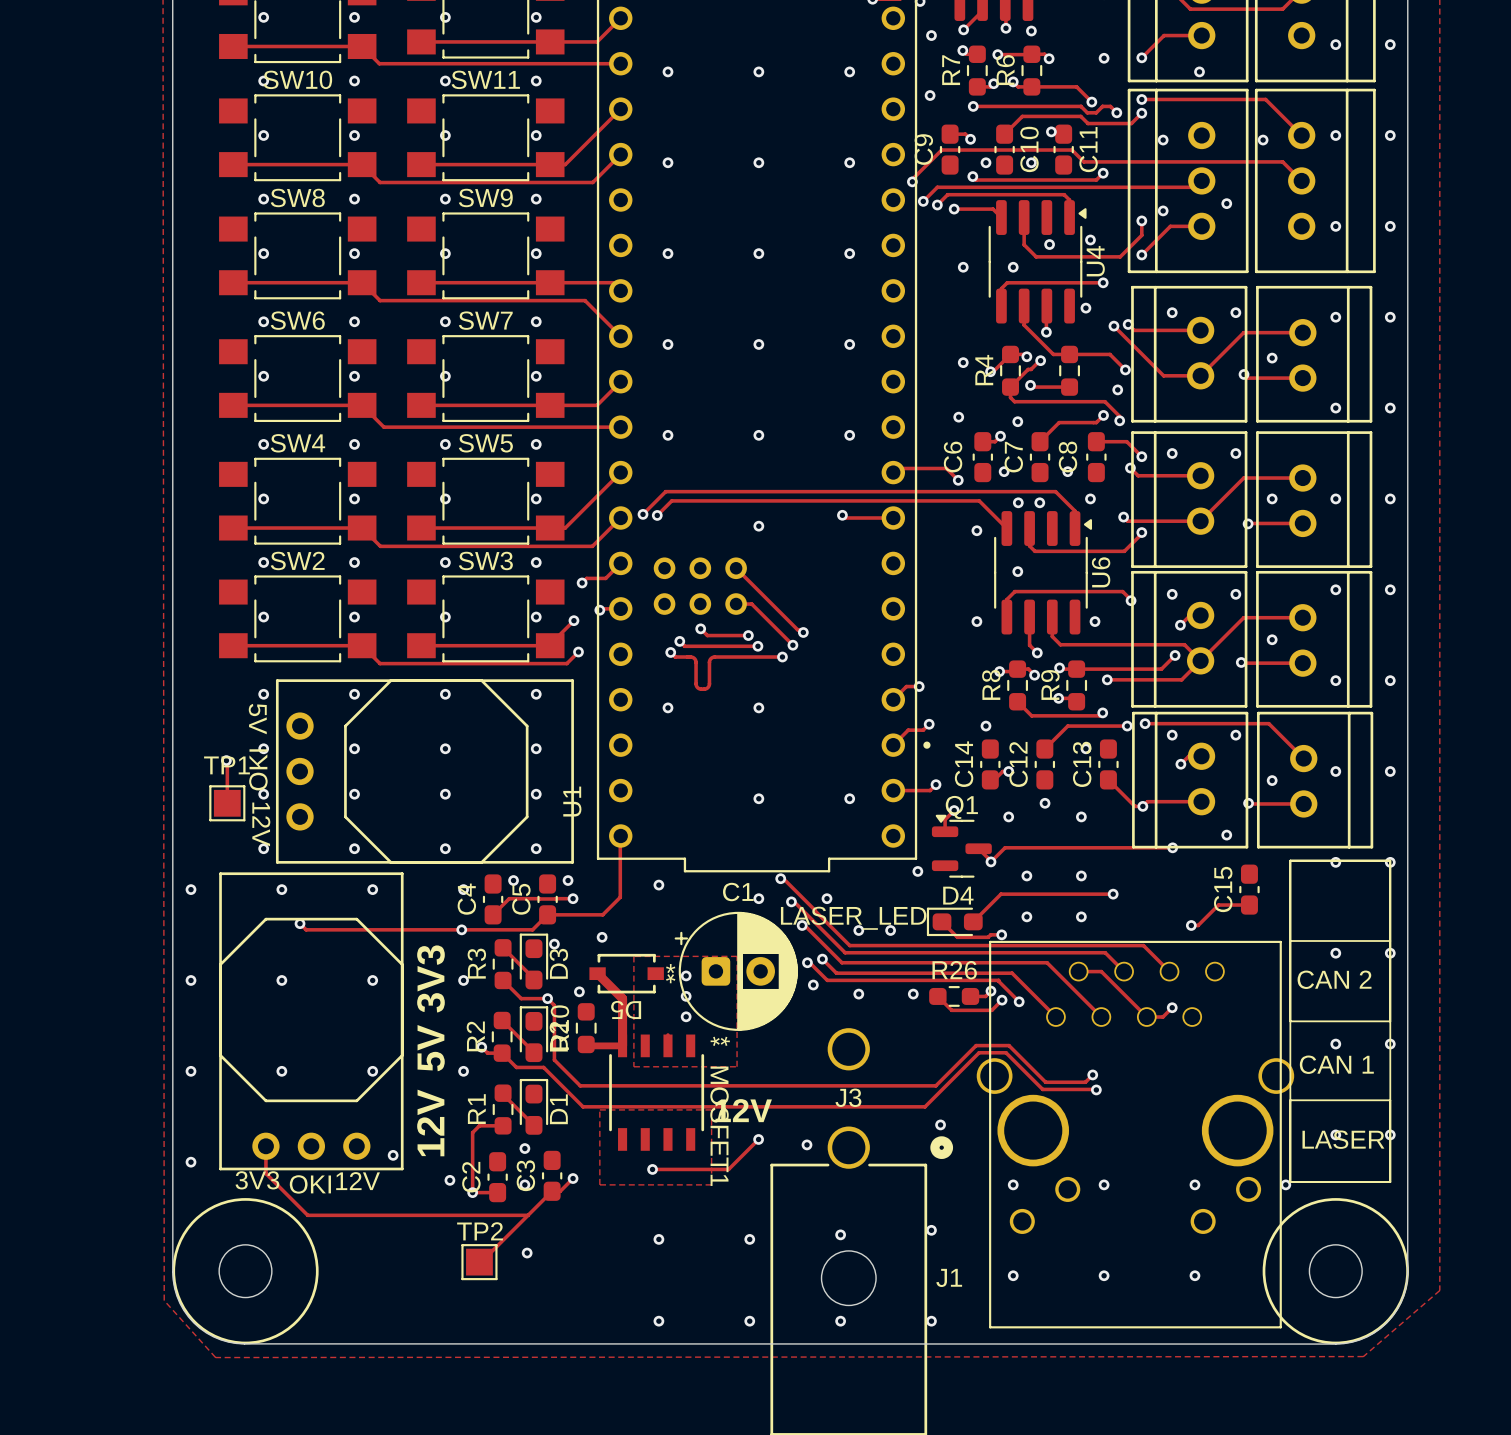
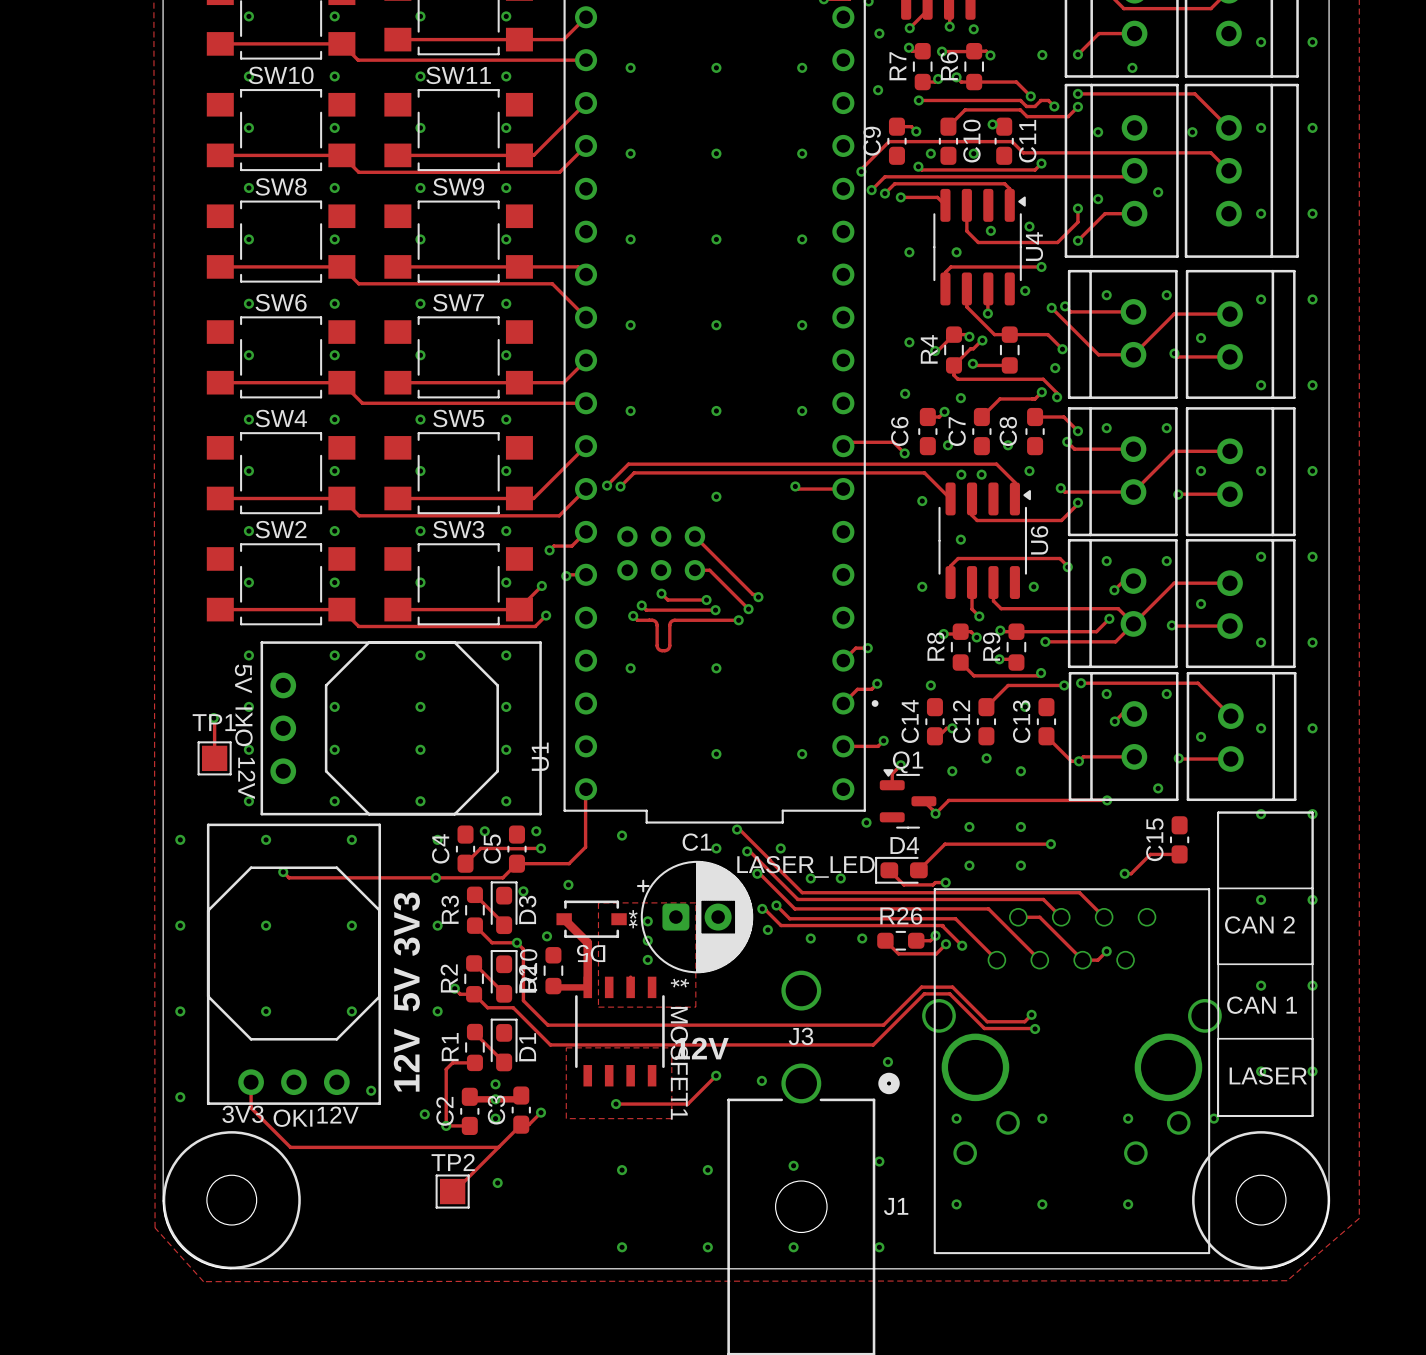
track: none -> (521, 1095) (517, 1099) (472, 1099) (469, 1096)
via: none -> (495, 1099)

